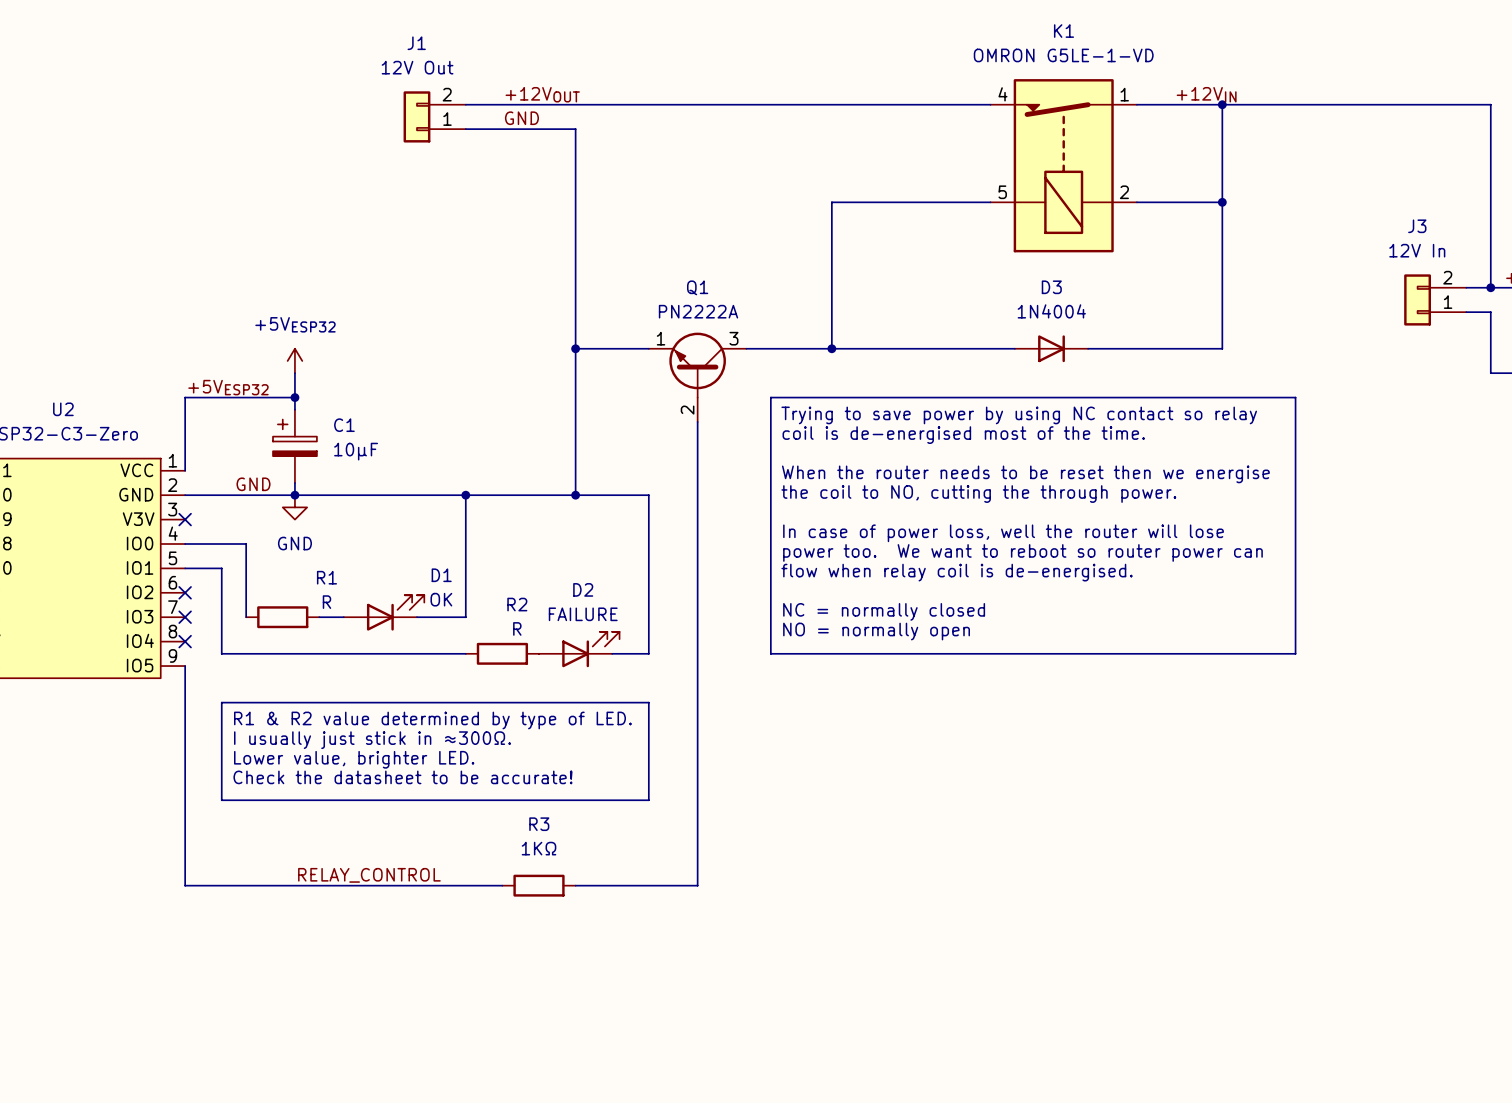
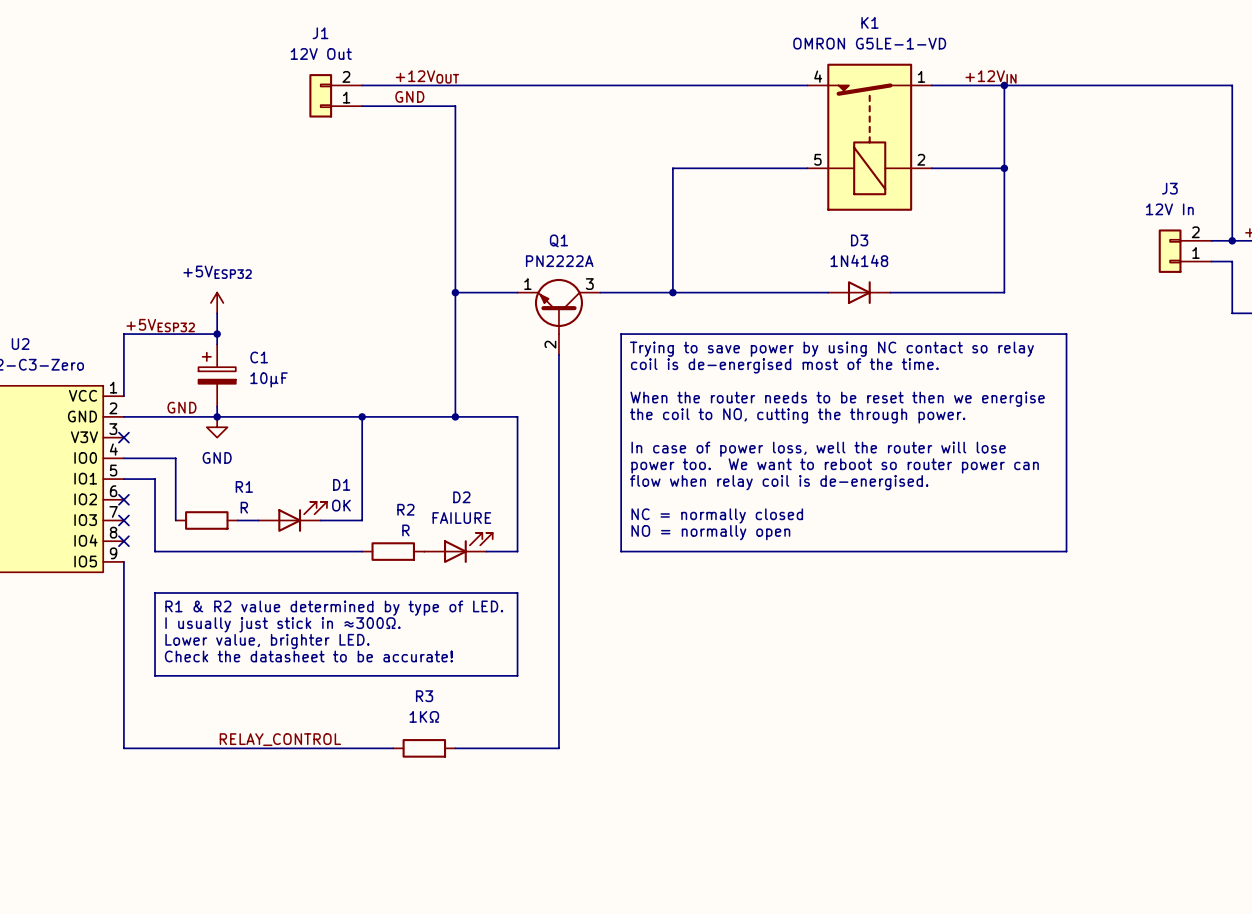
D3 value: 1N4004 (1051, 311) -> 1N4148 (859, 260)

